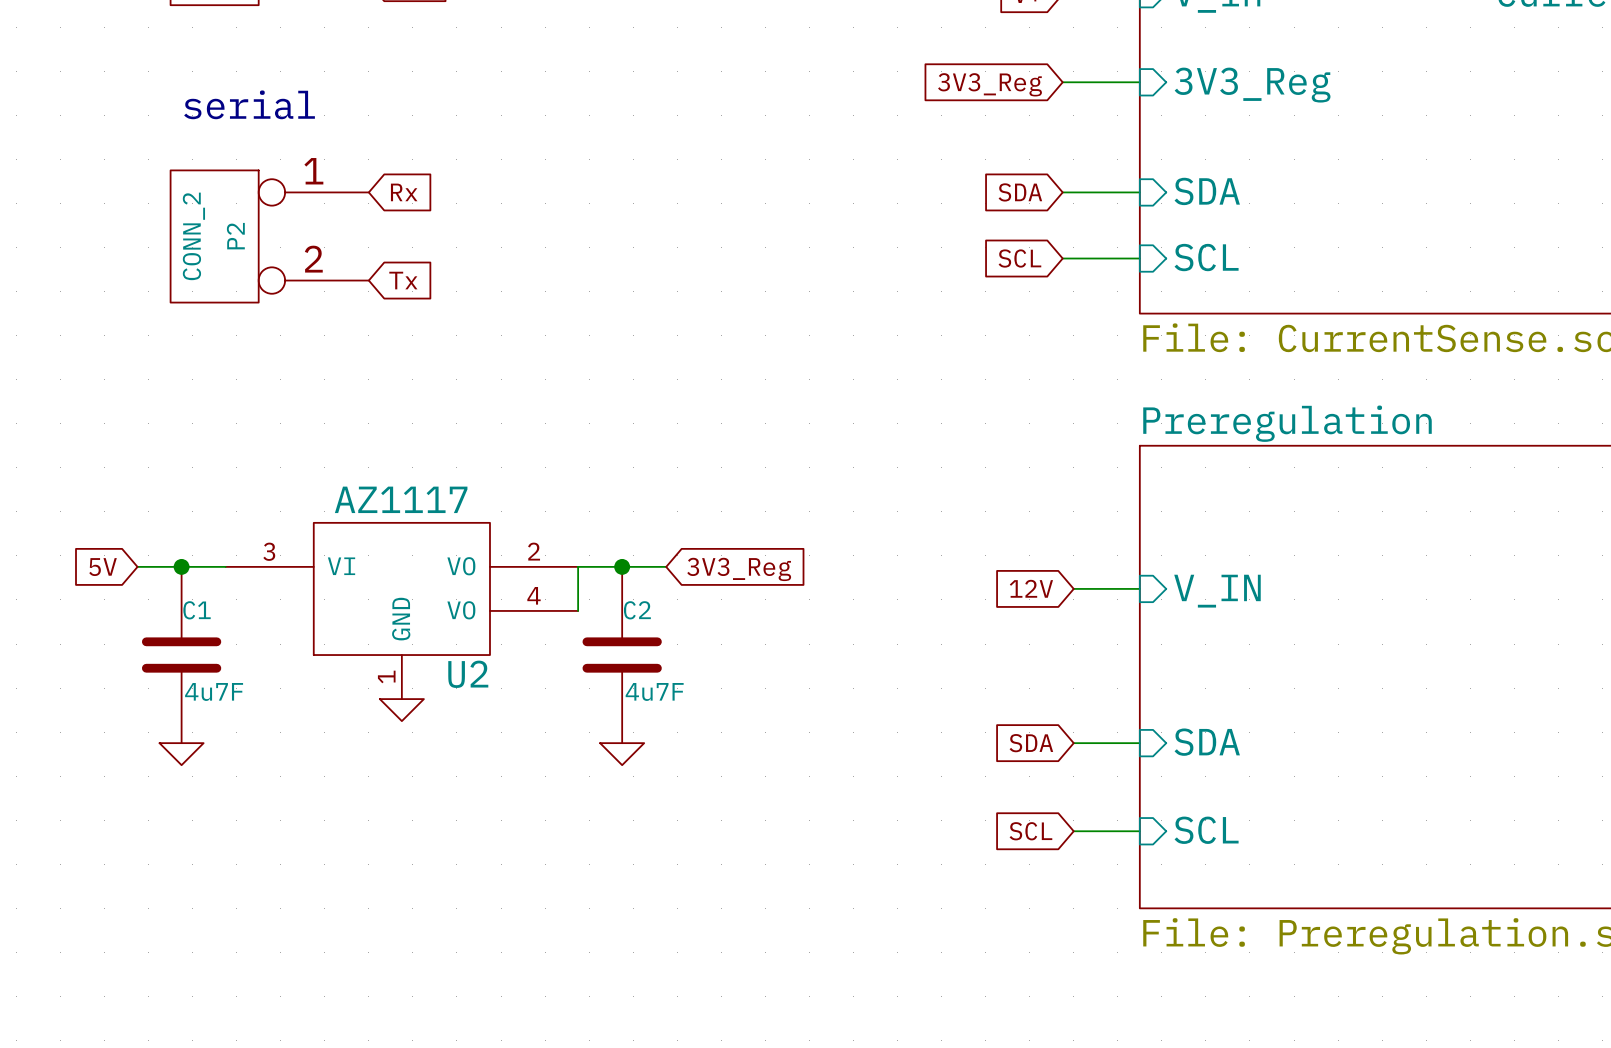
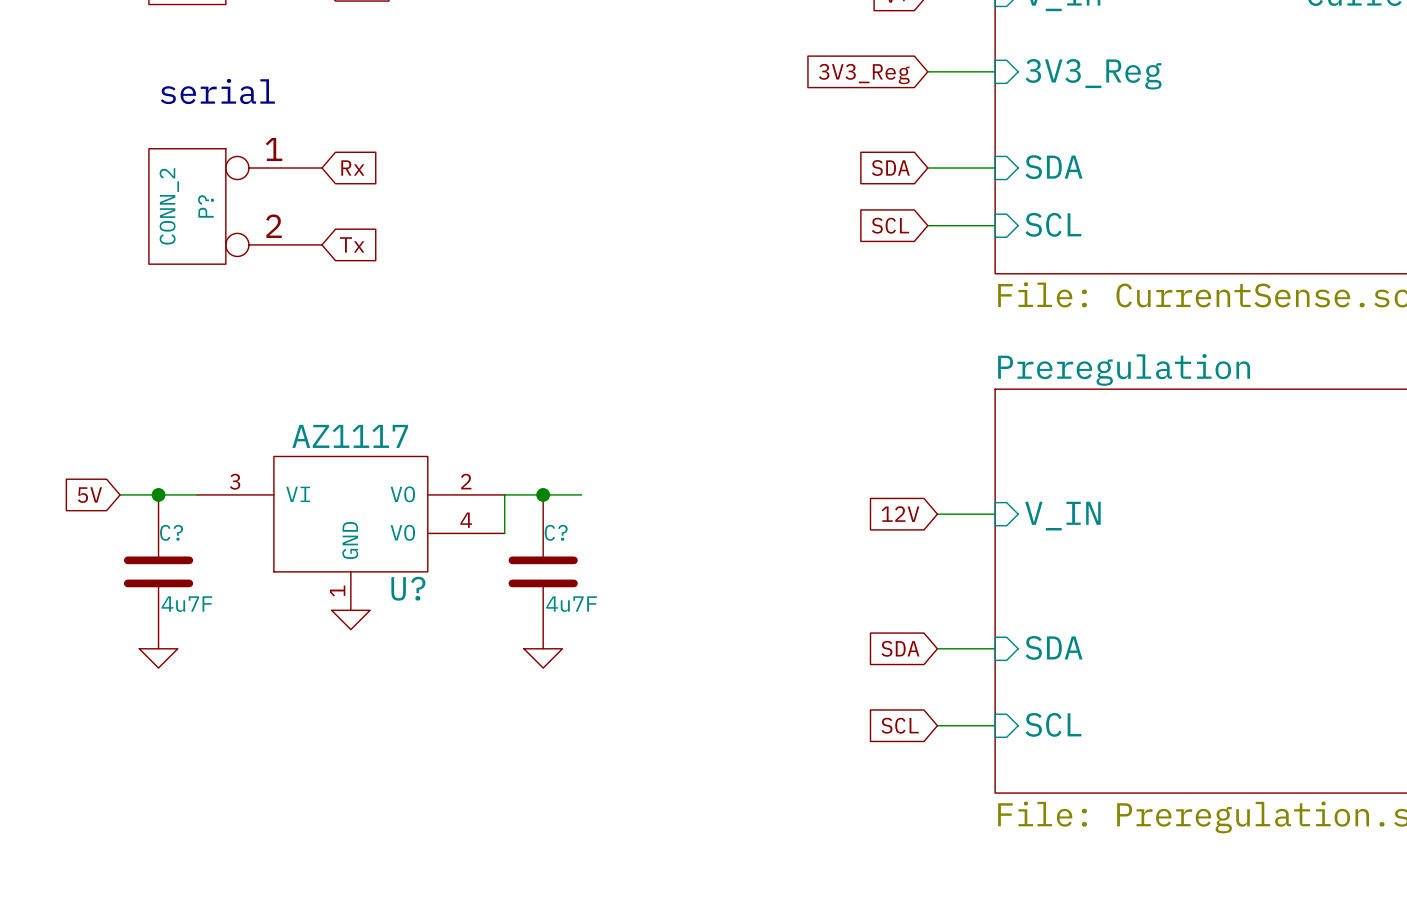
P2 name: P2 (235, 236) -> P? (206, 206)
global label: 3V3_Reg (739, 569) -> none
C1 name: C1 (197, 610) -> C? (171, 532)
C2 name: C2 (637, 610) -> C? (556, 532)
U2 name: U2 (468, 674) -> U? (408, 588)

